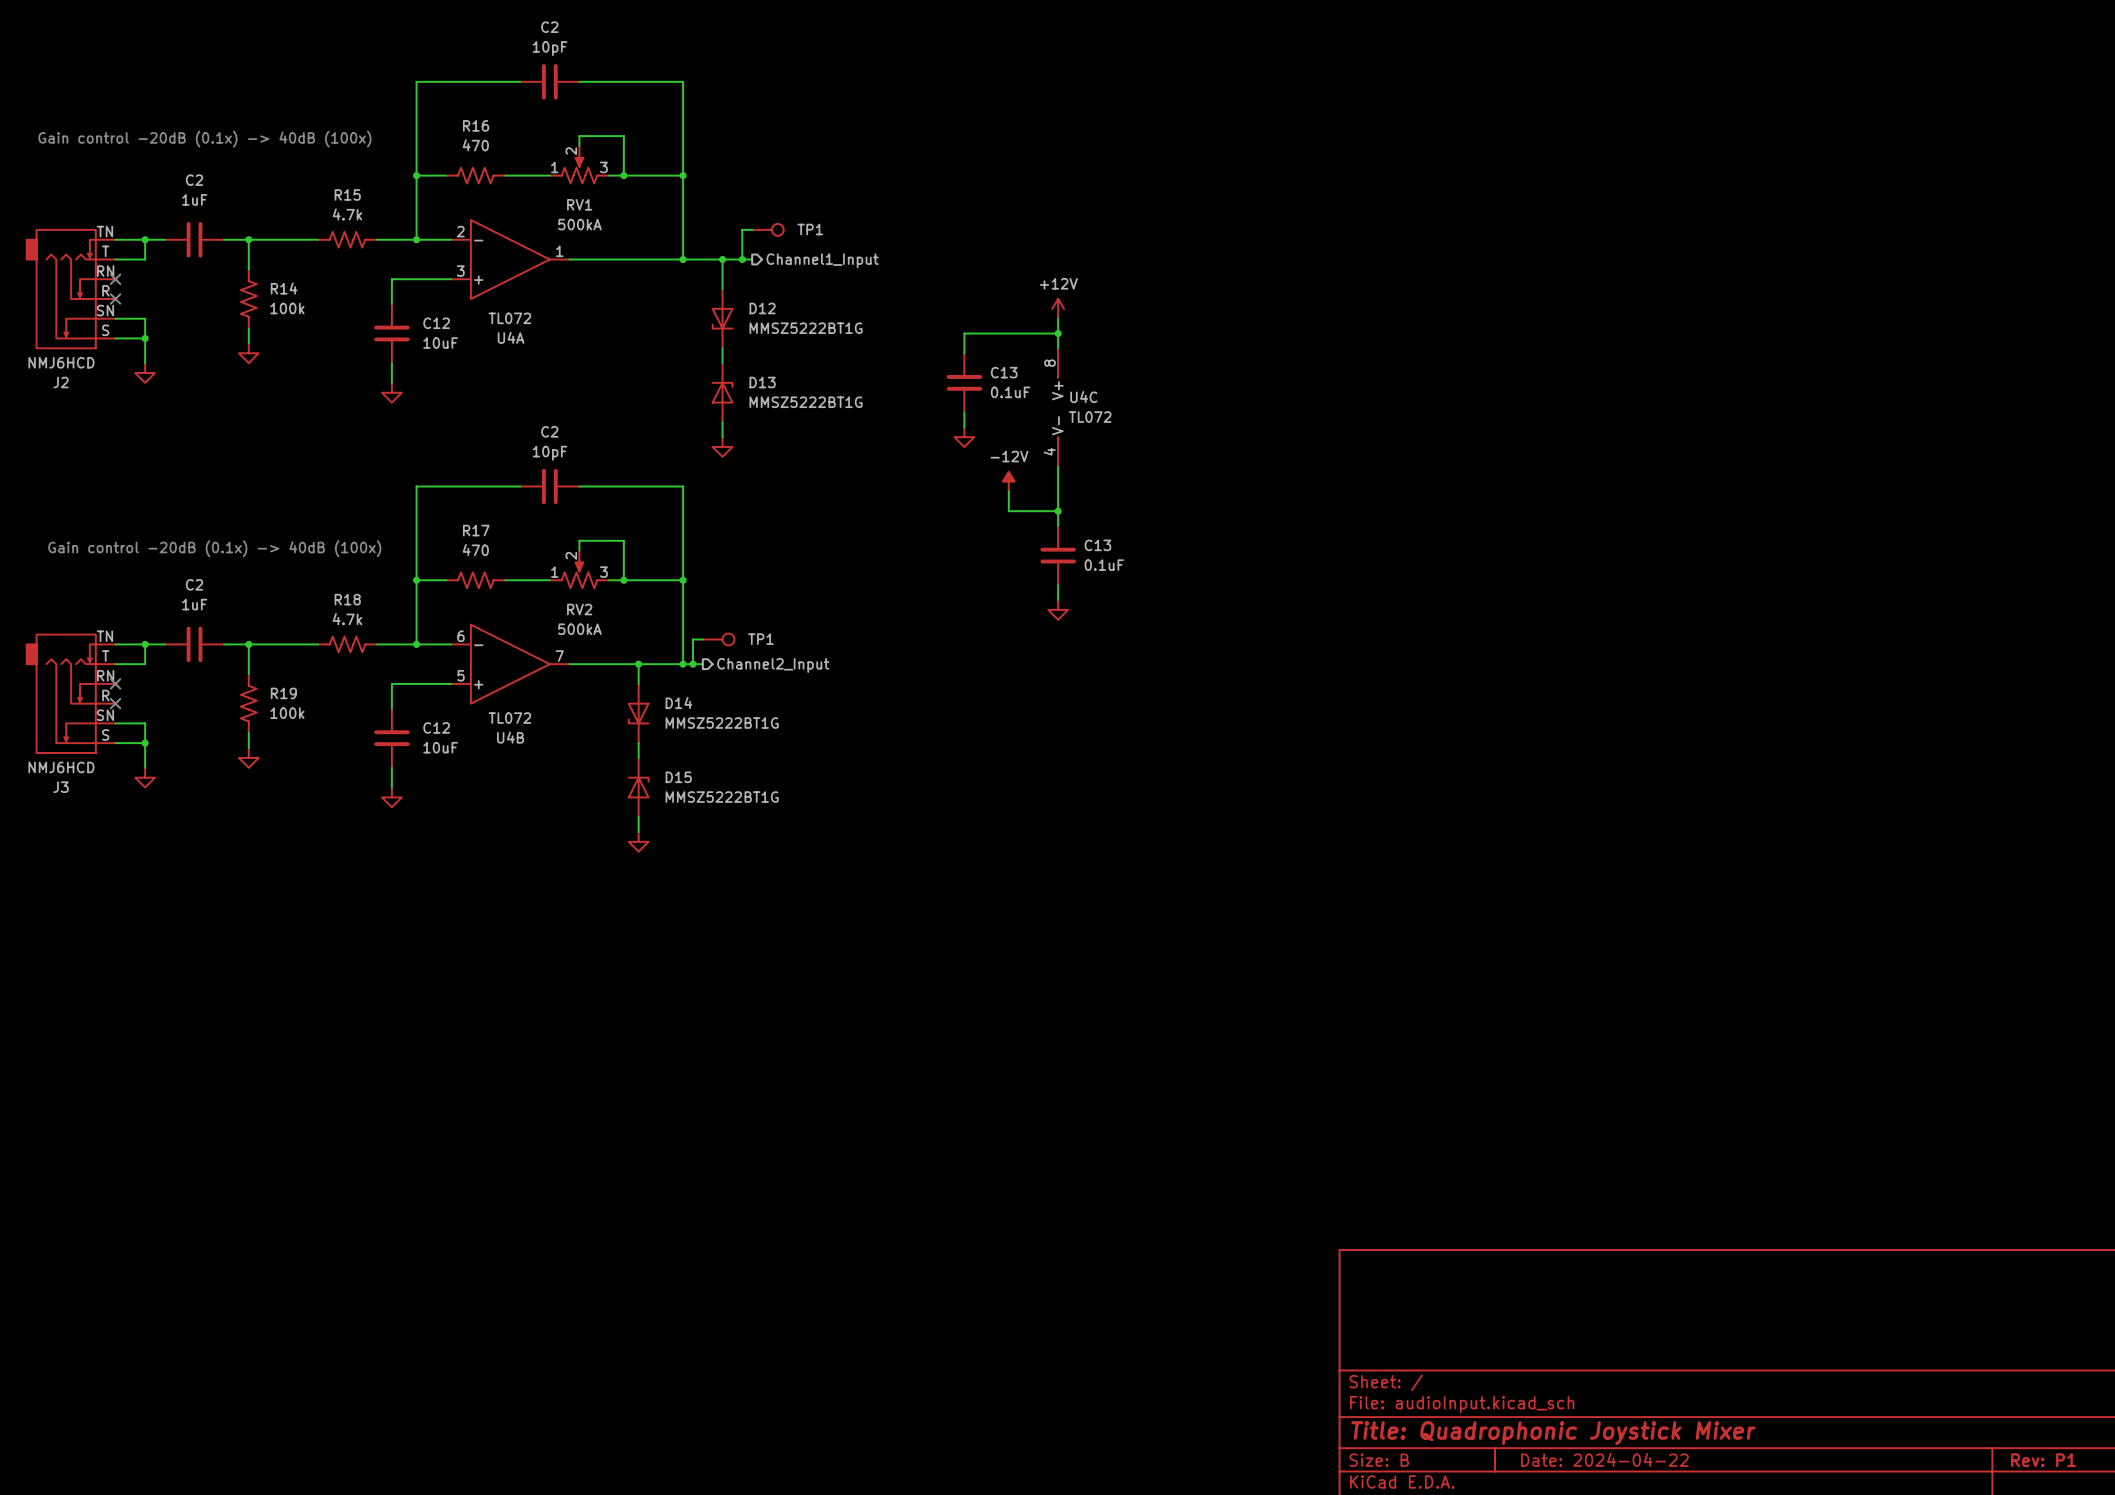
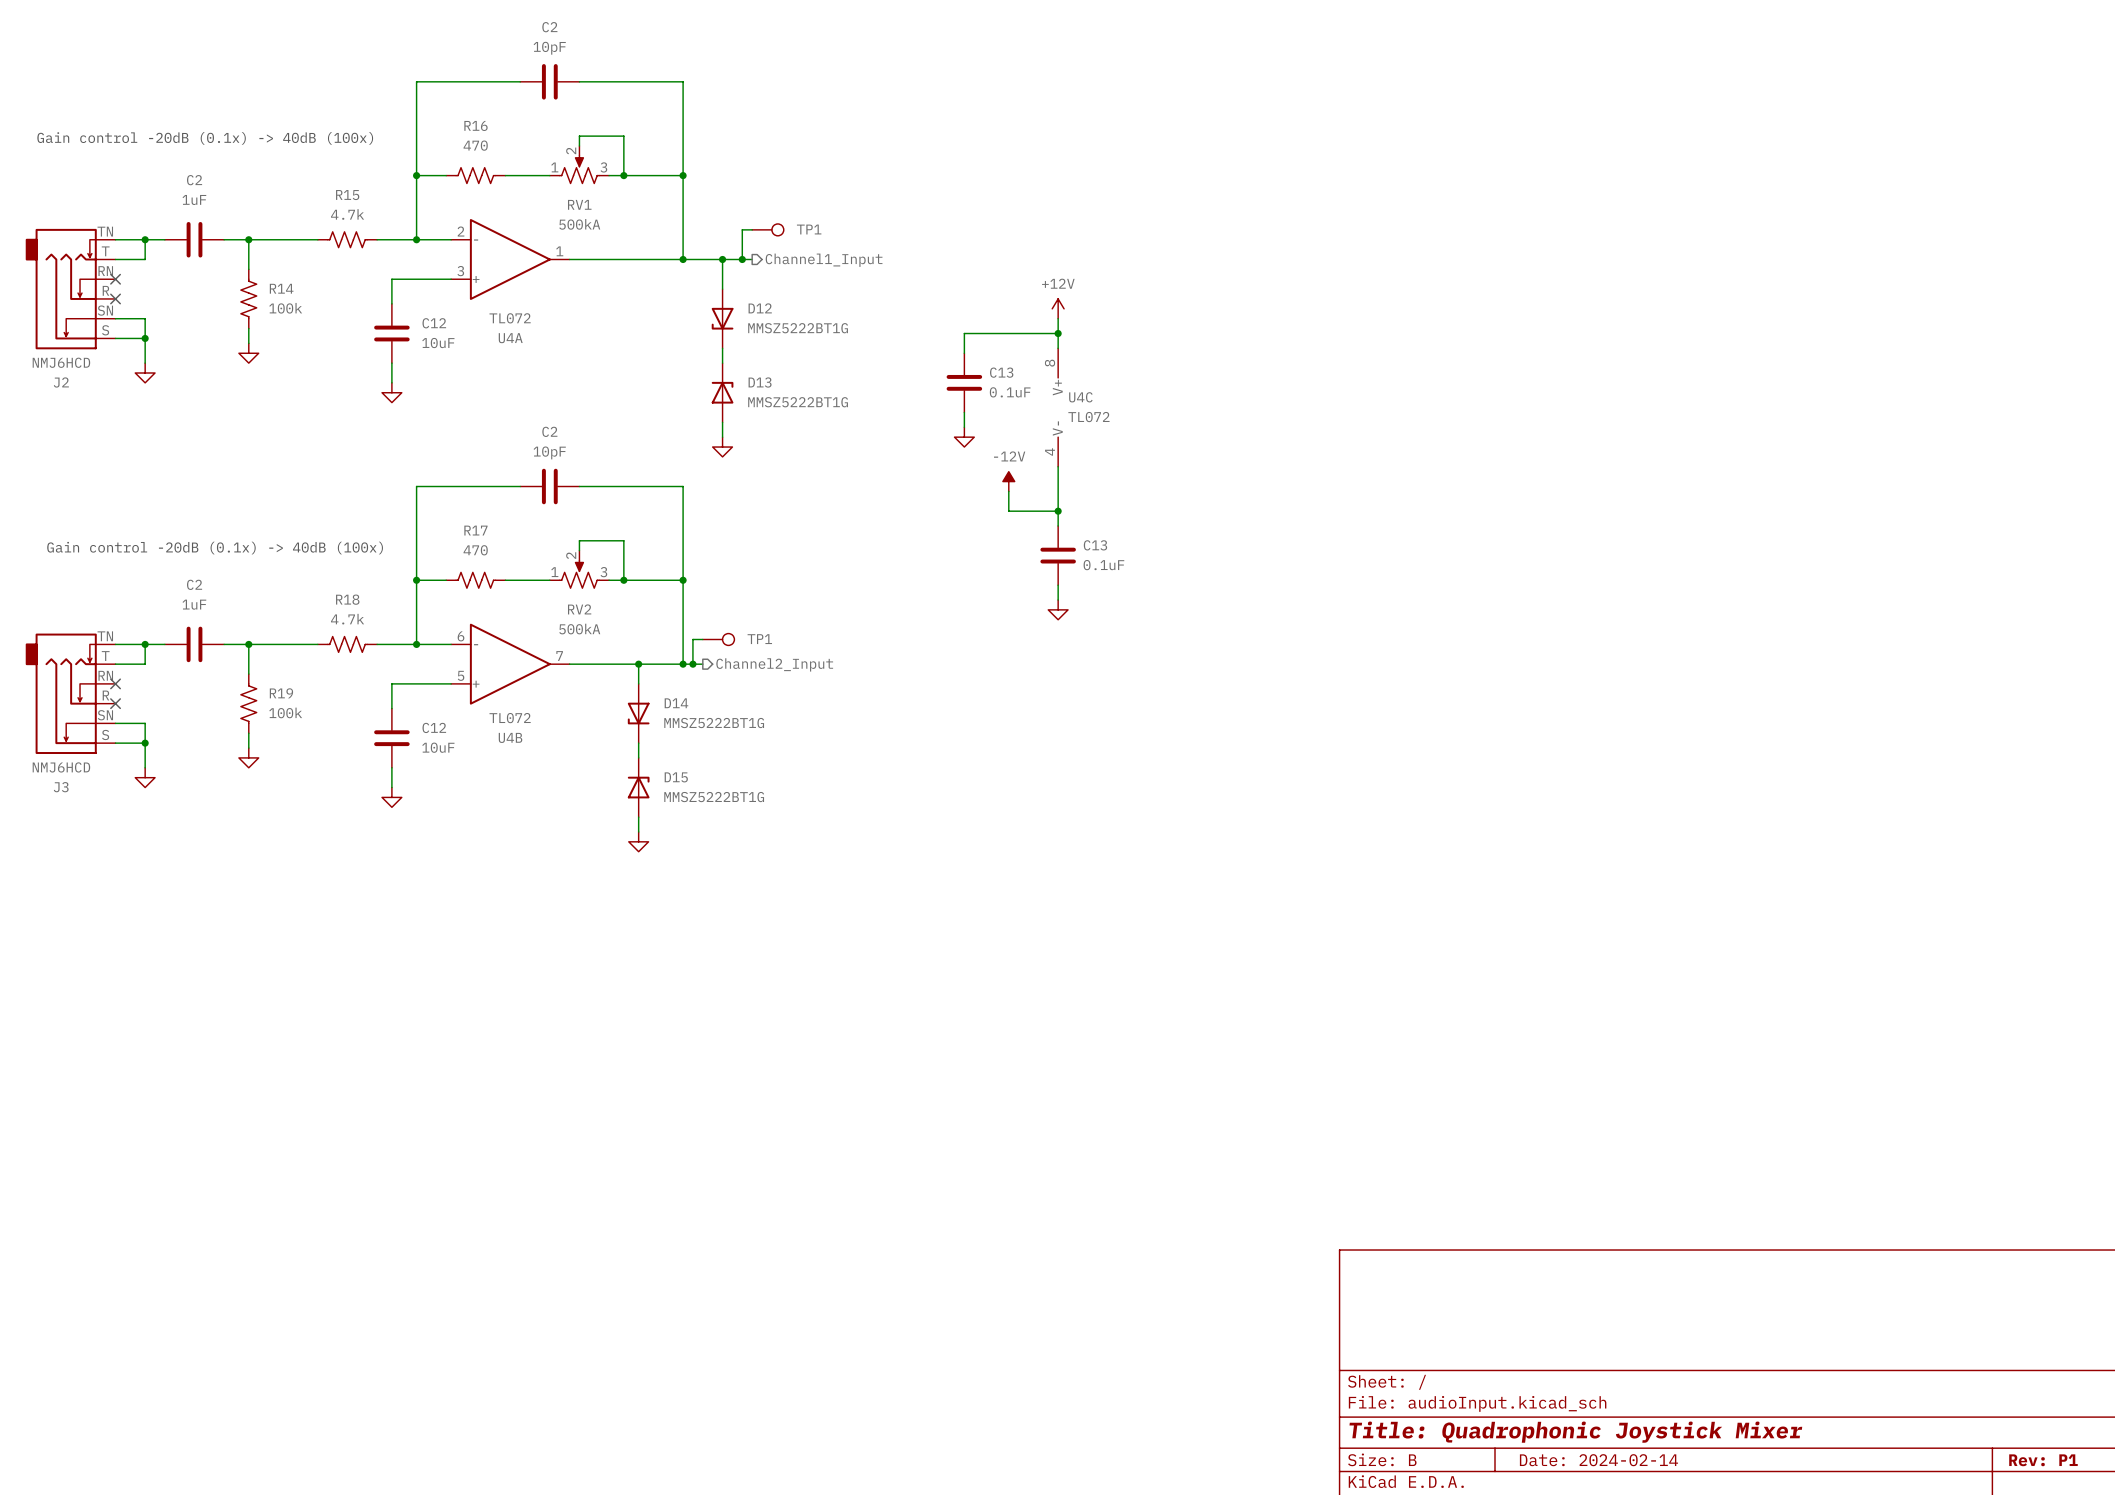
title block: Date: 2024-04-22 (1604, 1459) -> Date: 2024-02-14 (1598, 1460)

